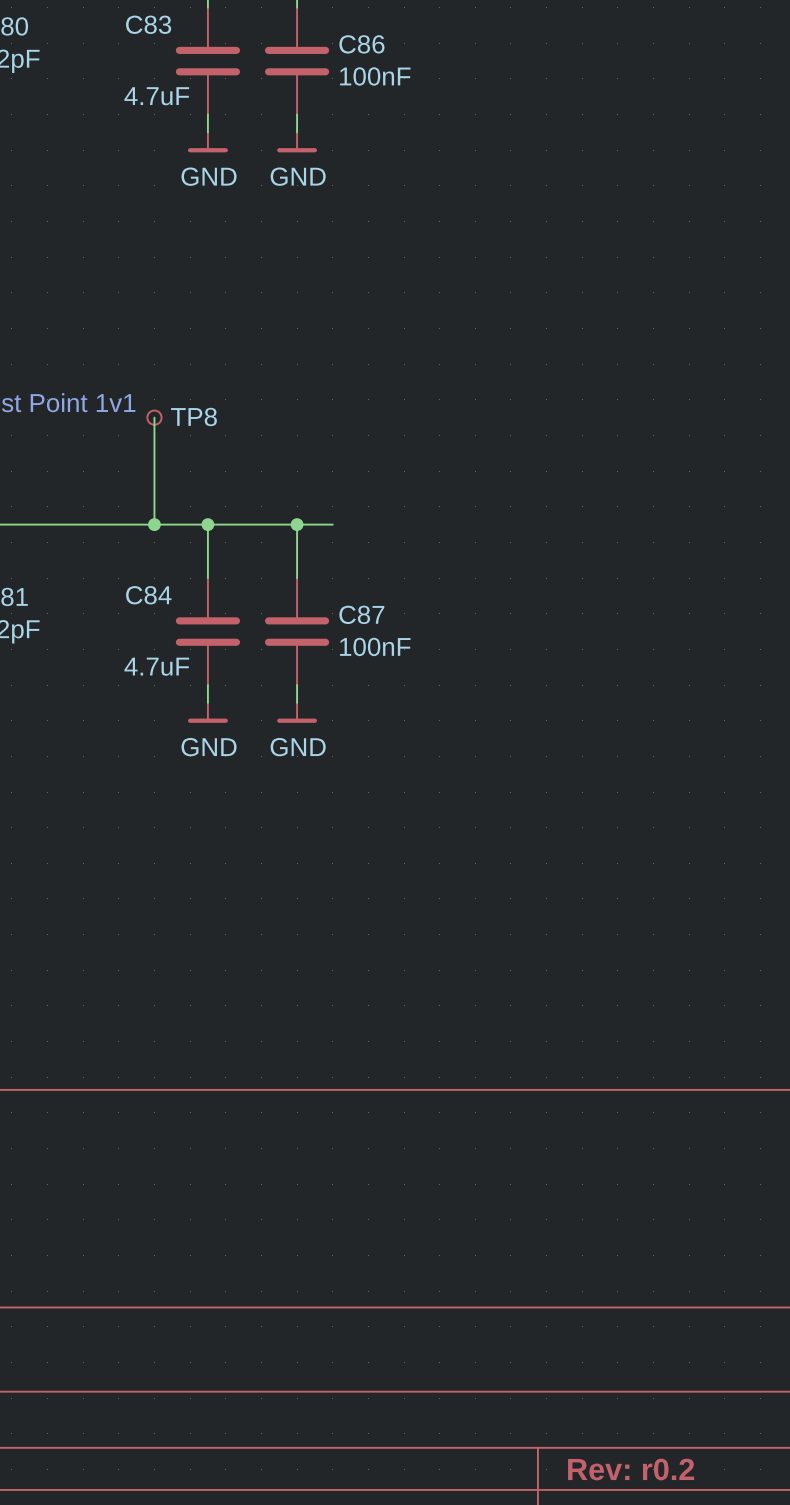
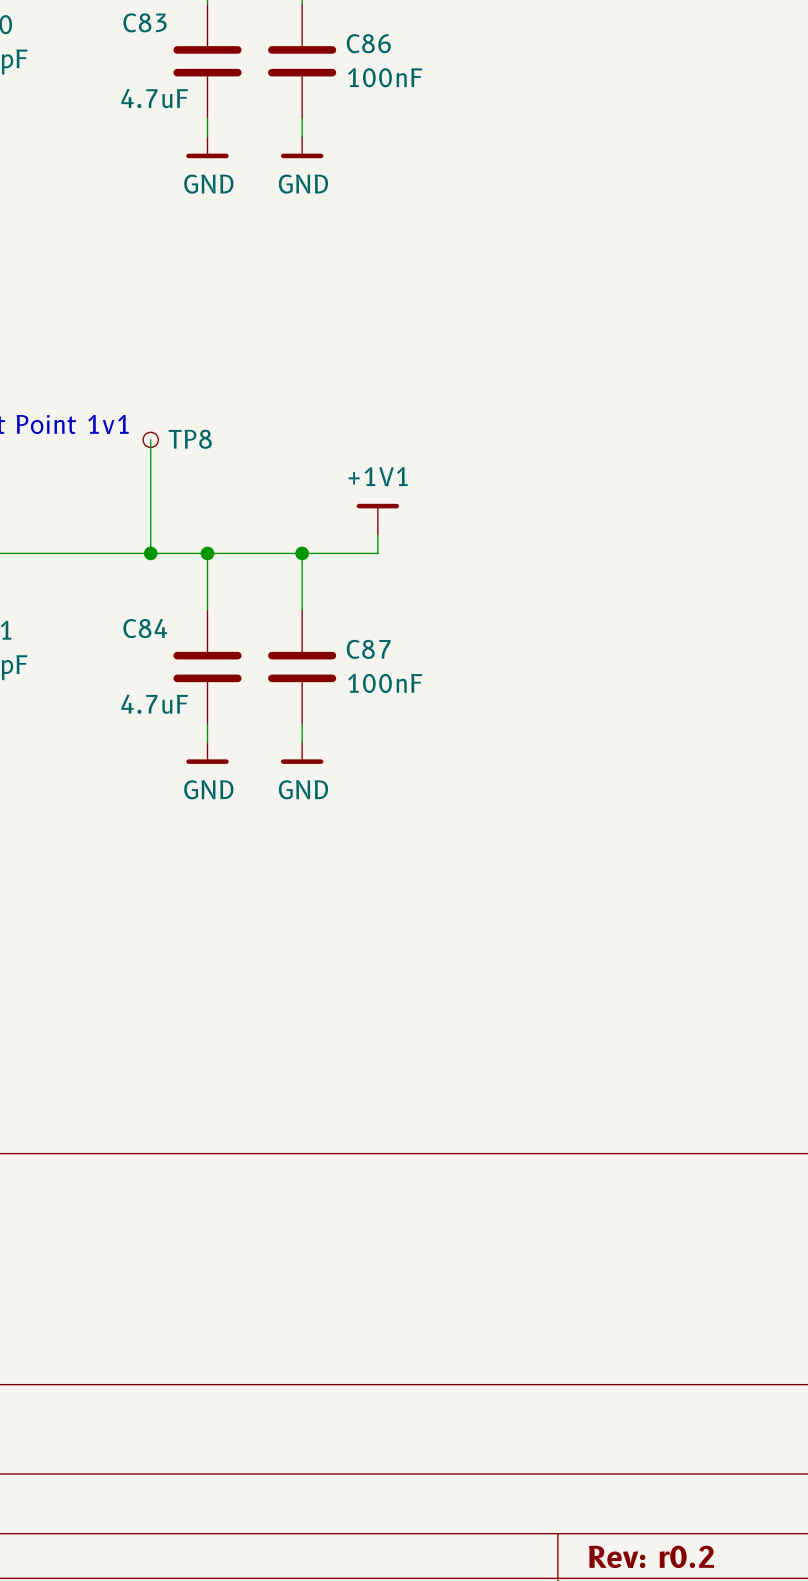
power symbol: none -> +1V1 (377, 519)
wire: none -> (377, 534) (377, 553) (340, 553)

